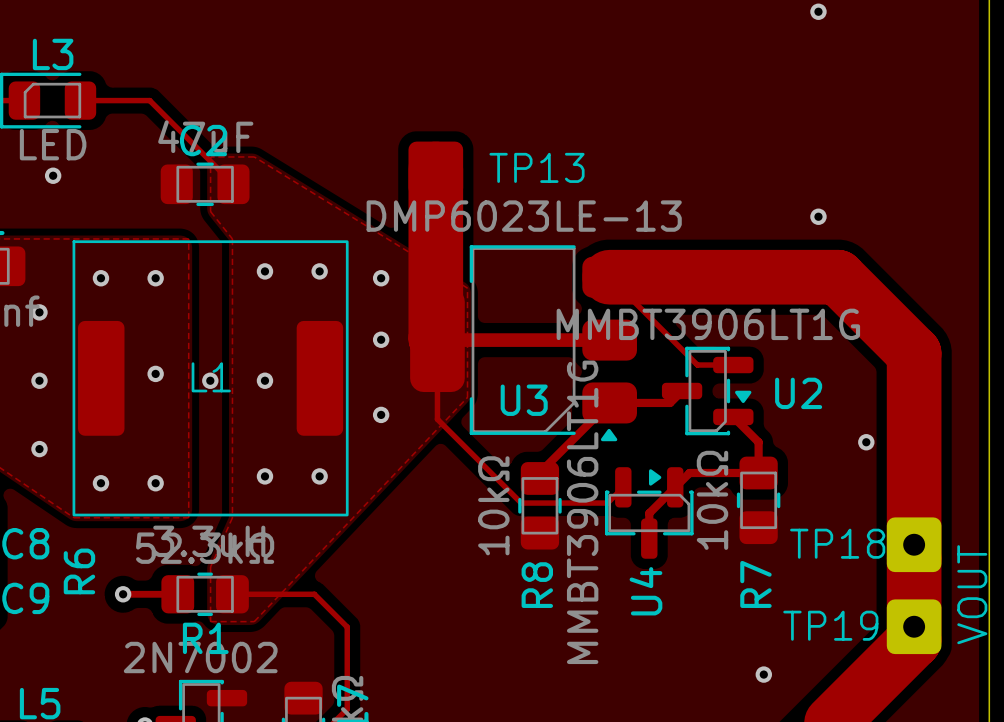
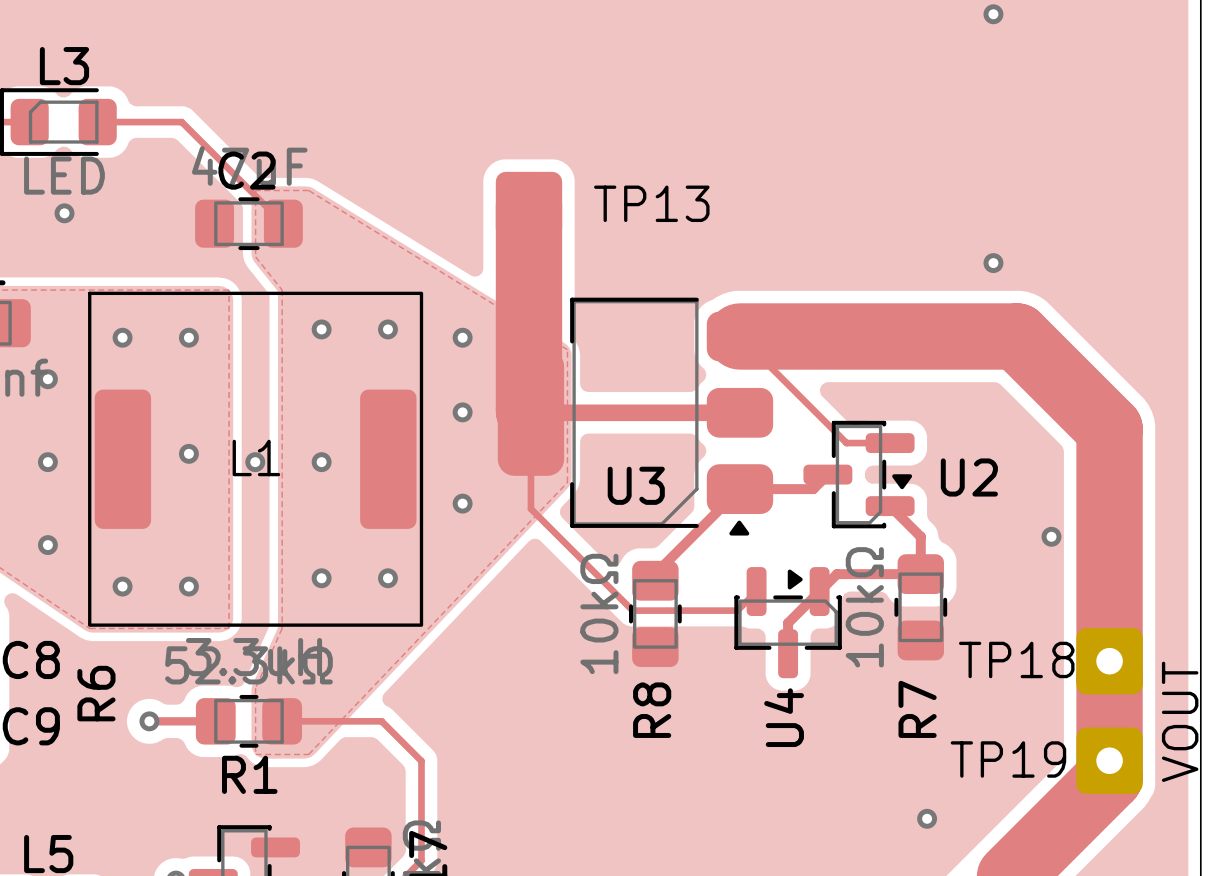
U3 value: DMP6023LE-13 (524, 216) -> none
U2 value: MMBT3906LT1G (708, 324) -> none
U4 value: MMBT3906LT1G (582, 512) -> none
part value: 2N7002 (200, 657) -> none

